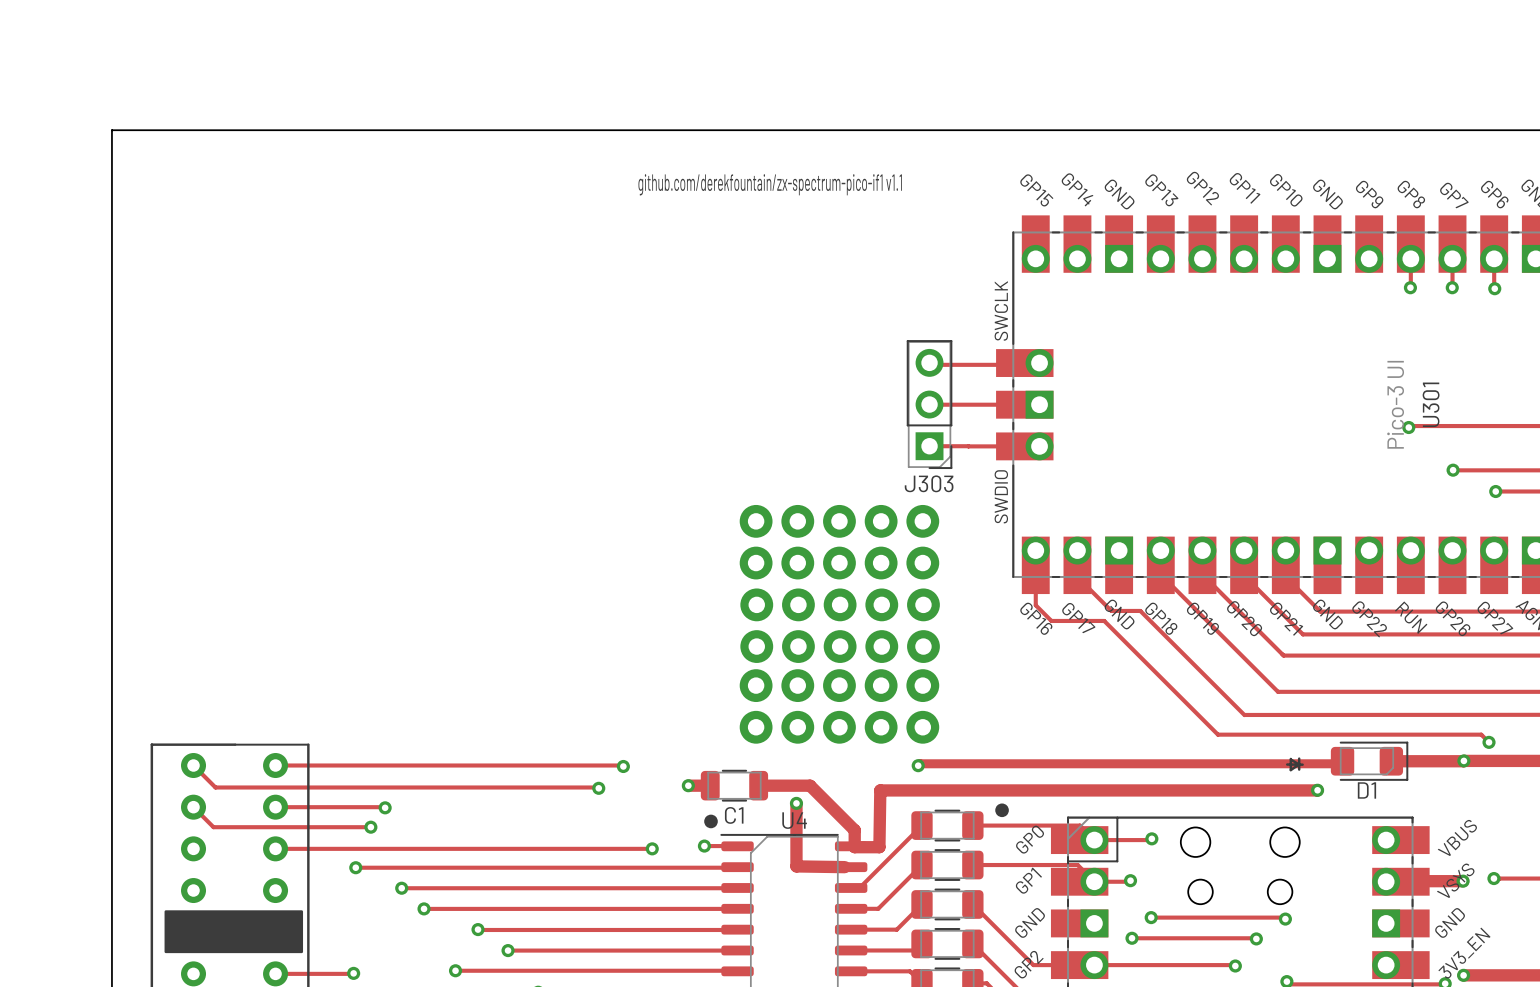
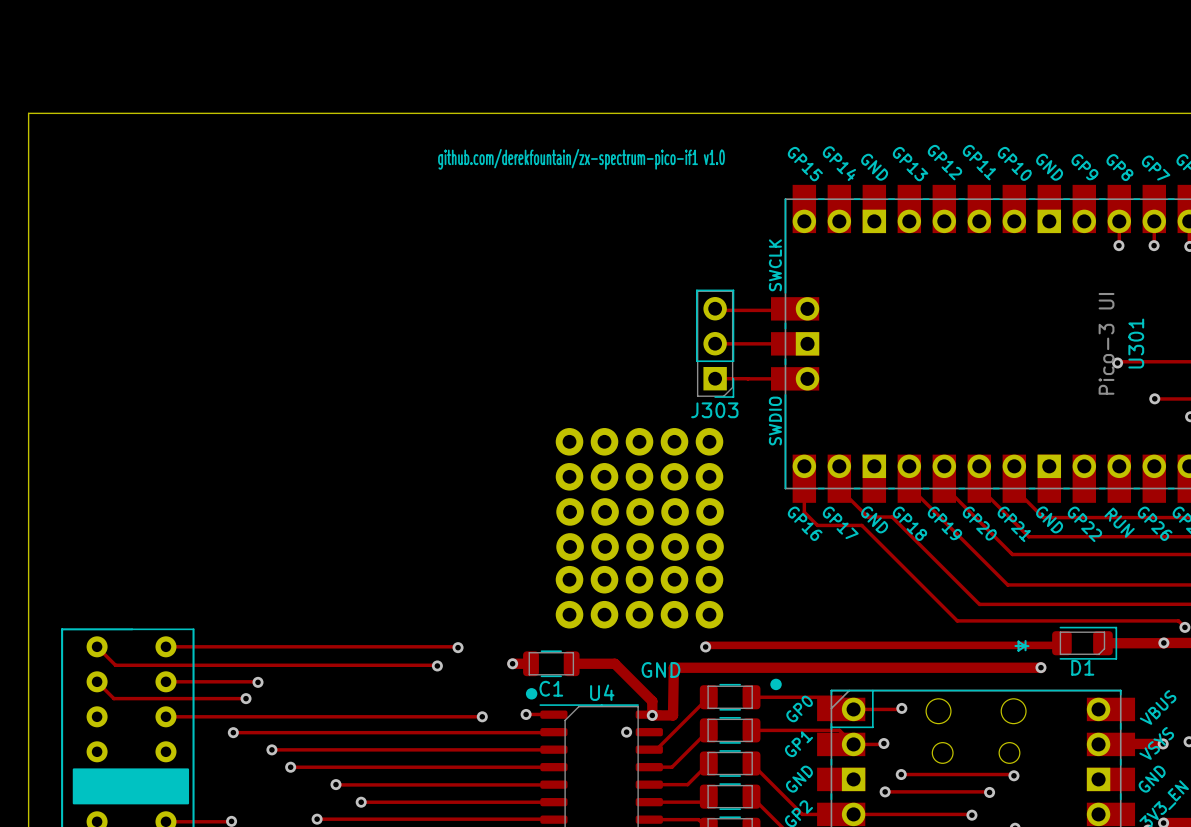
text: github.com/derekfountain/zx-spectrum-pico-if1 v1.1 (770, 184) -> github.com/derekfountain/zx-spectrum-pico-if1 v1.0 (581, 159)
text: none -> GND (660, 670)
track: (796, 803) (796, 866) (844, 867) -> none
via: (796, 803) -> none
via: none -> (652, 715)
via: none -> (626, 732)

